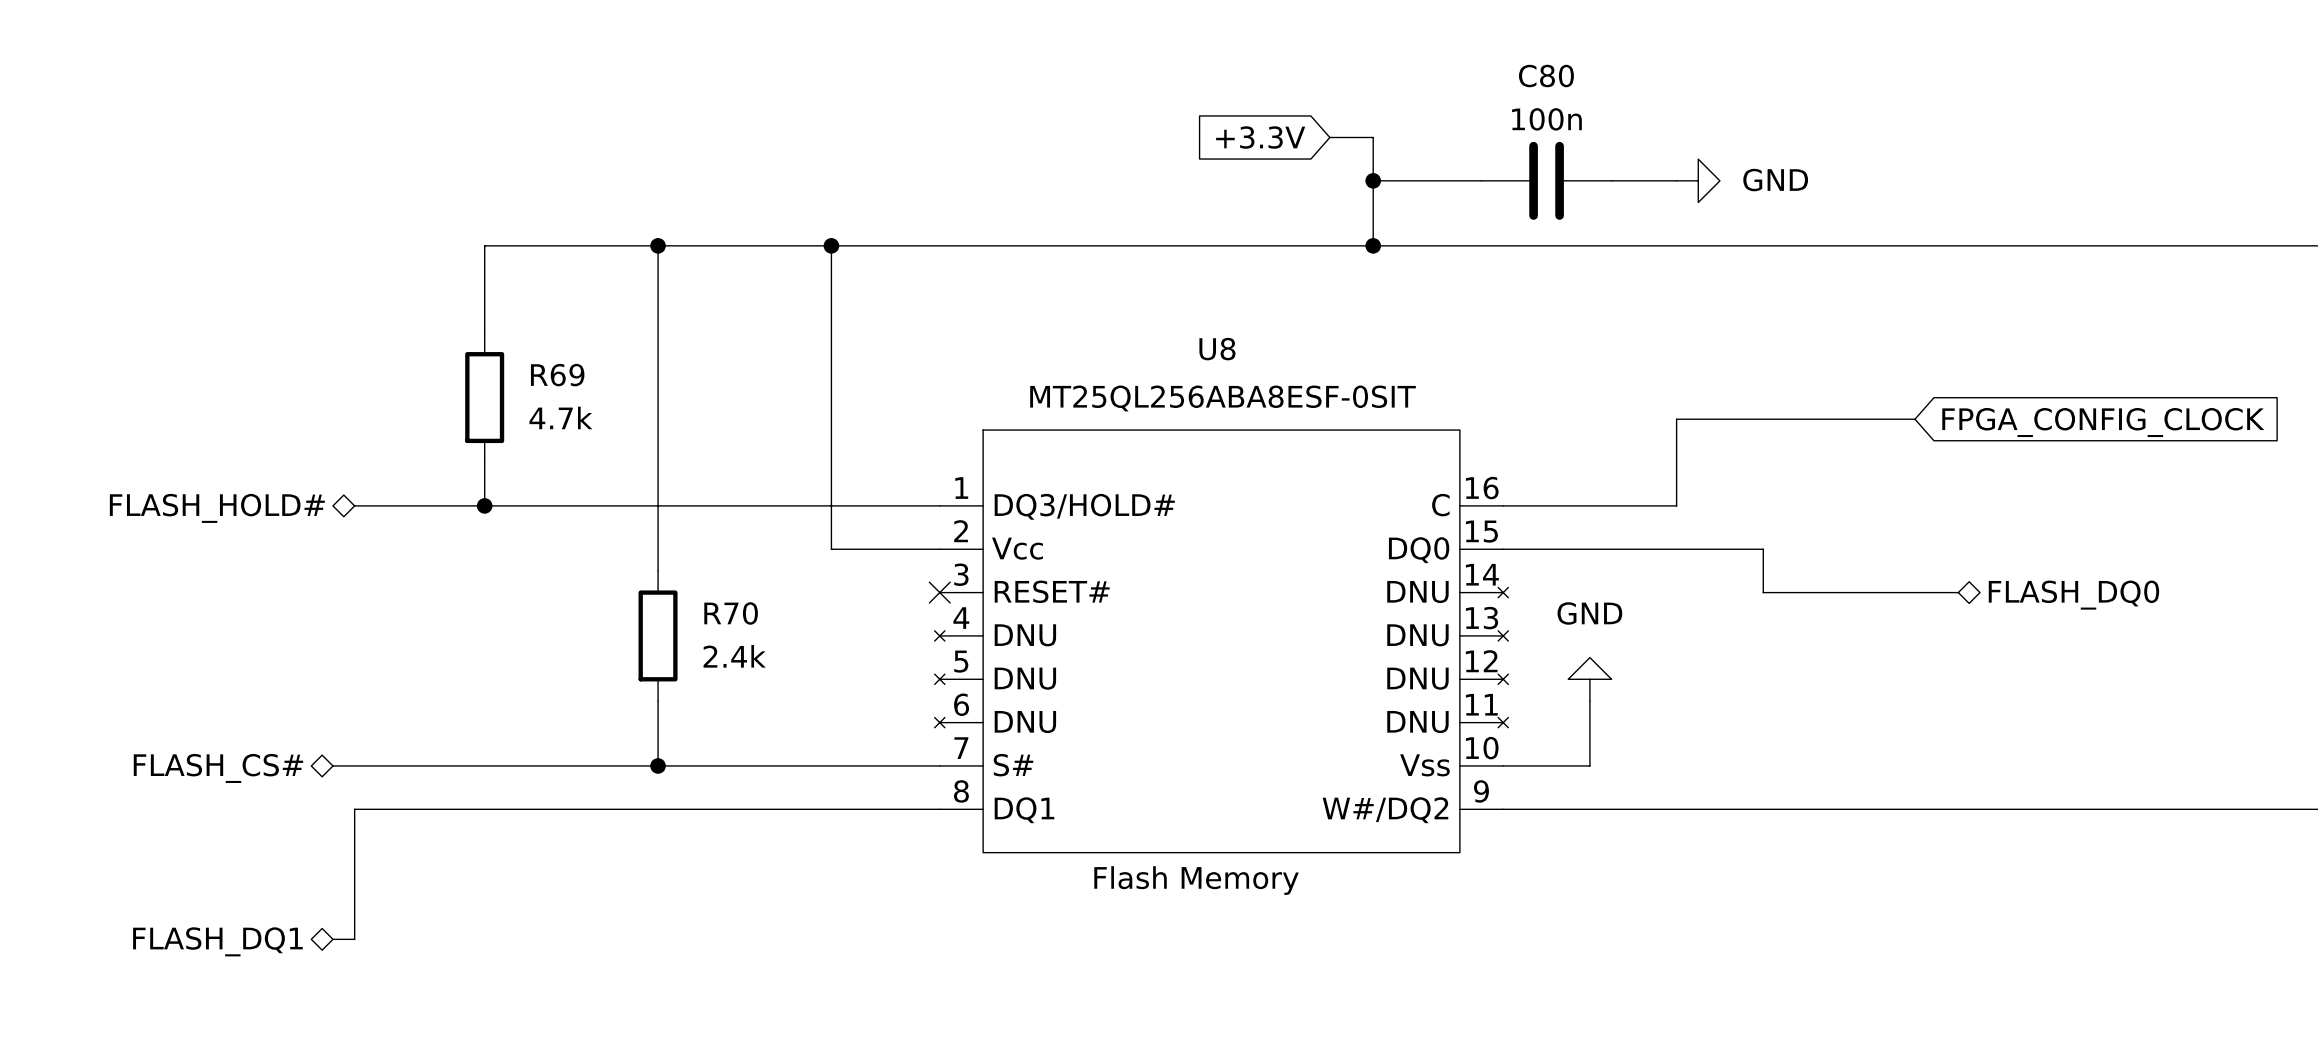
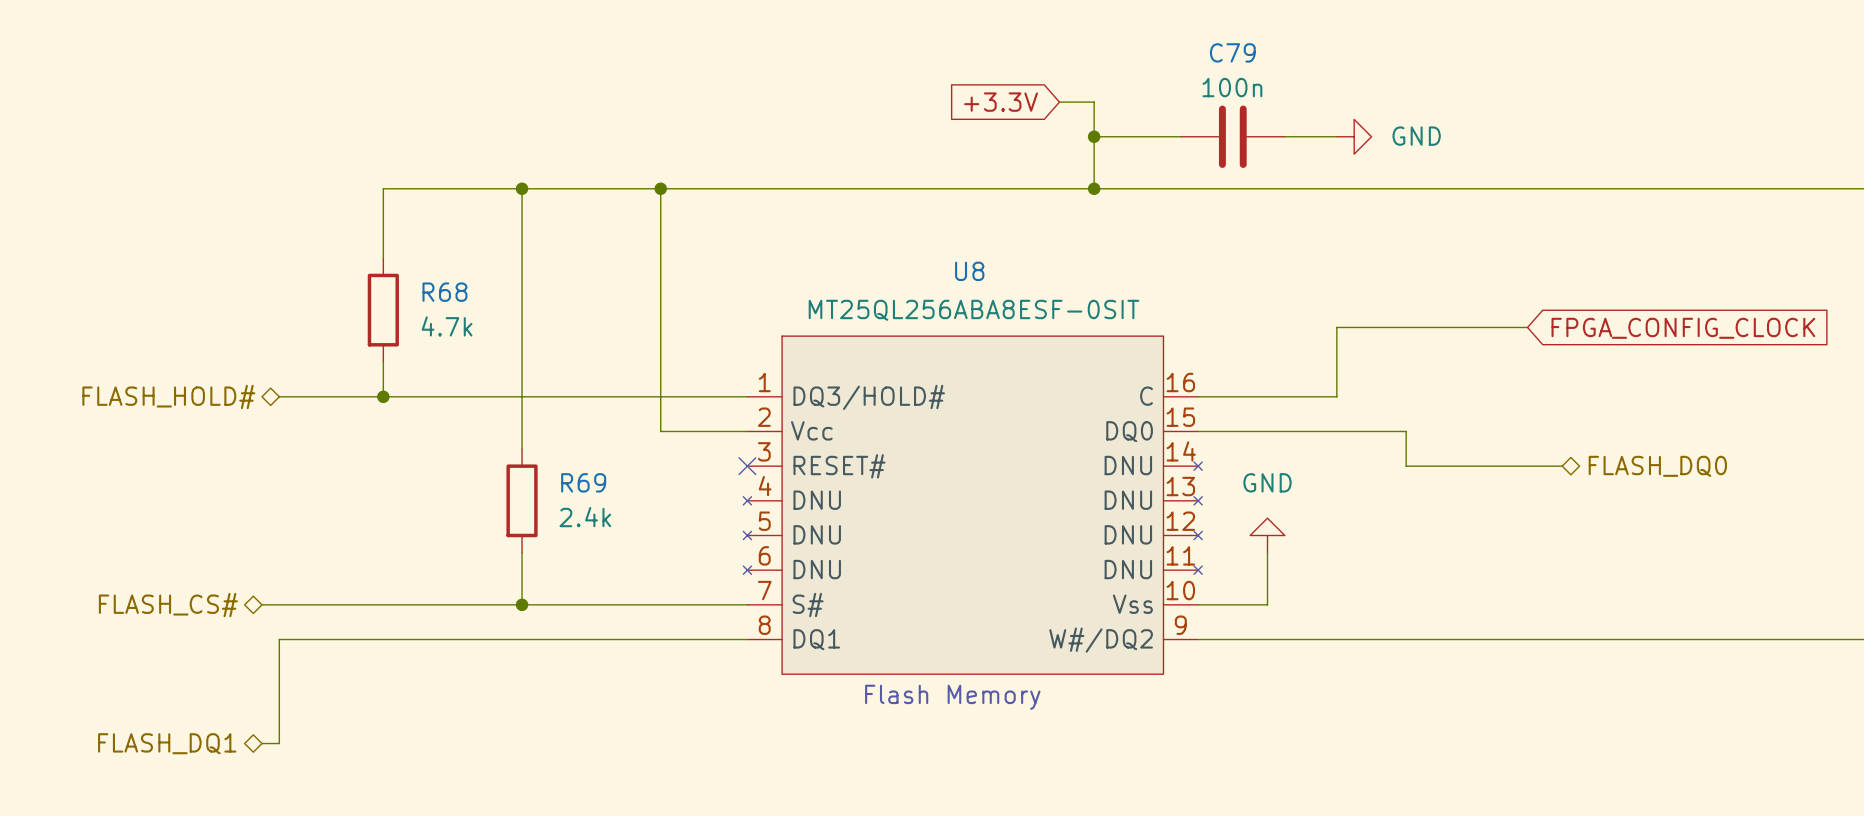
C80 name: C80 (1546, 76) -> C79 (1232, 52)
R69 name: R69 (557, 375) -> R68 (444, 292)
R70 name: R70 (731, 613) -> R69 (583, 482)

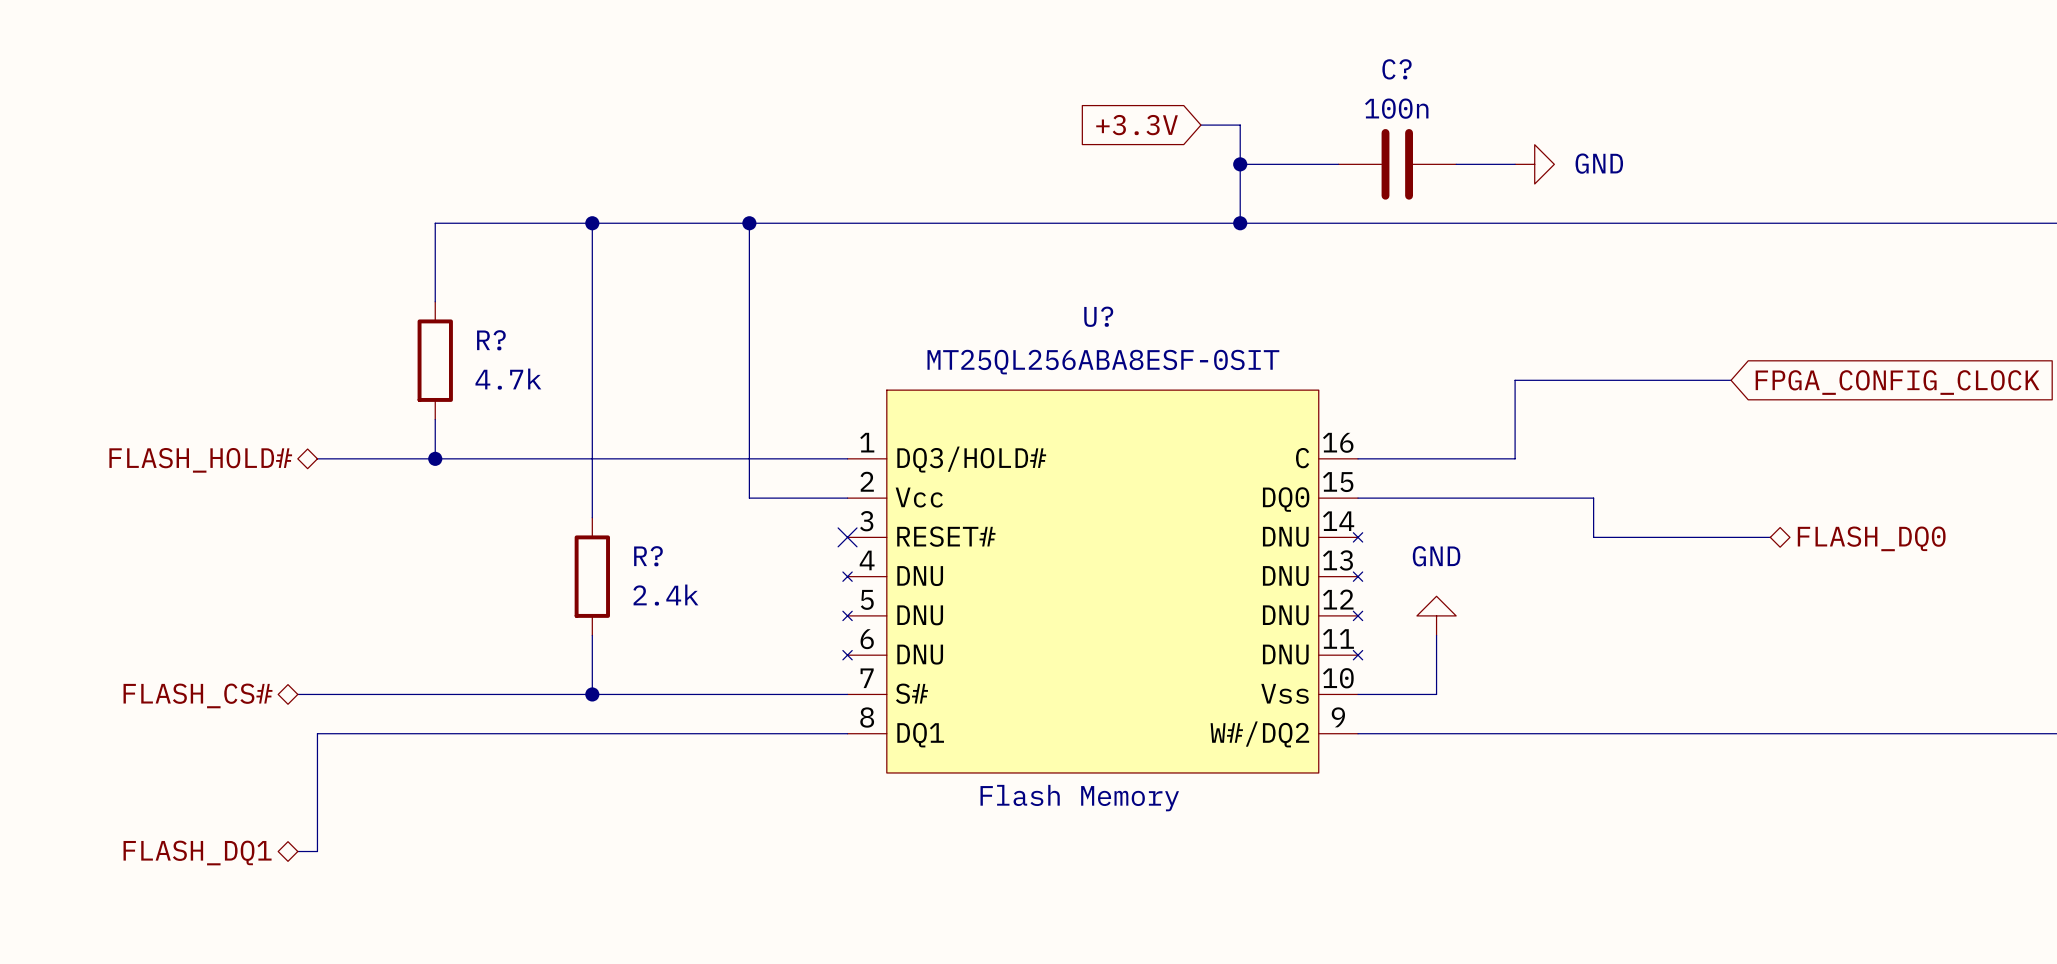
C79 name: C79 (1232, 52) -> C? (1397, 69)
U8 name: U8 (969, 271) -> U? (1098, 316)
R68 name: R68 (444, 292) -> R? (491, 340)
R69 name: R69 (583, 482) -> R? (648, 556)

